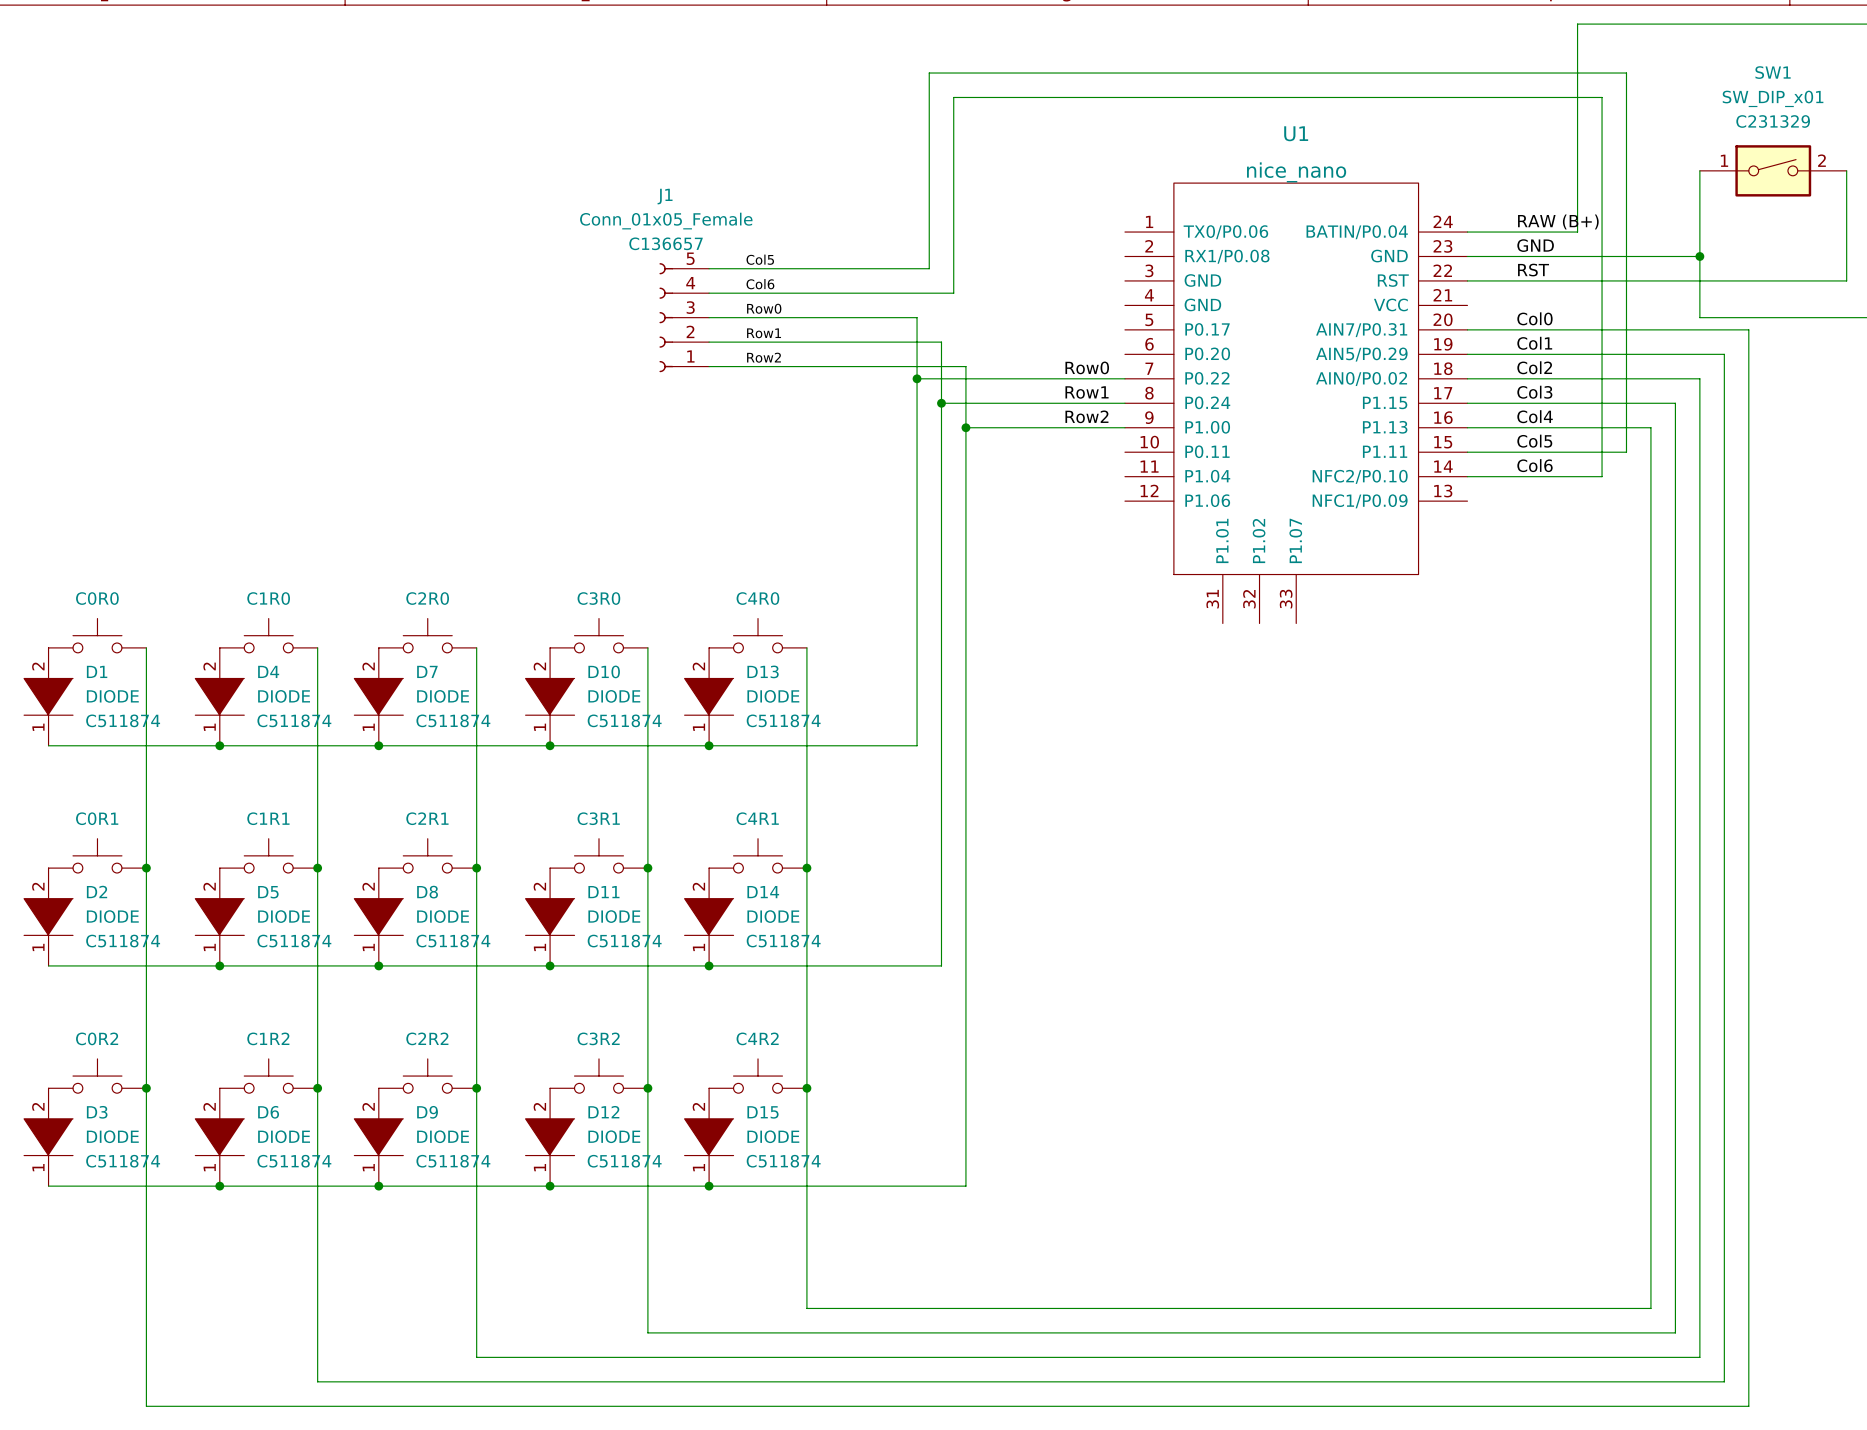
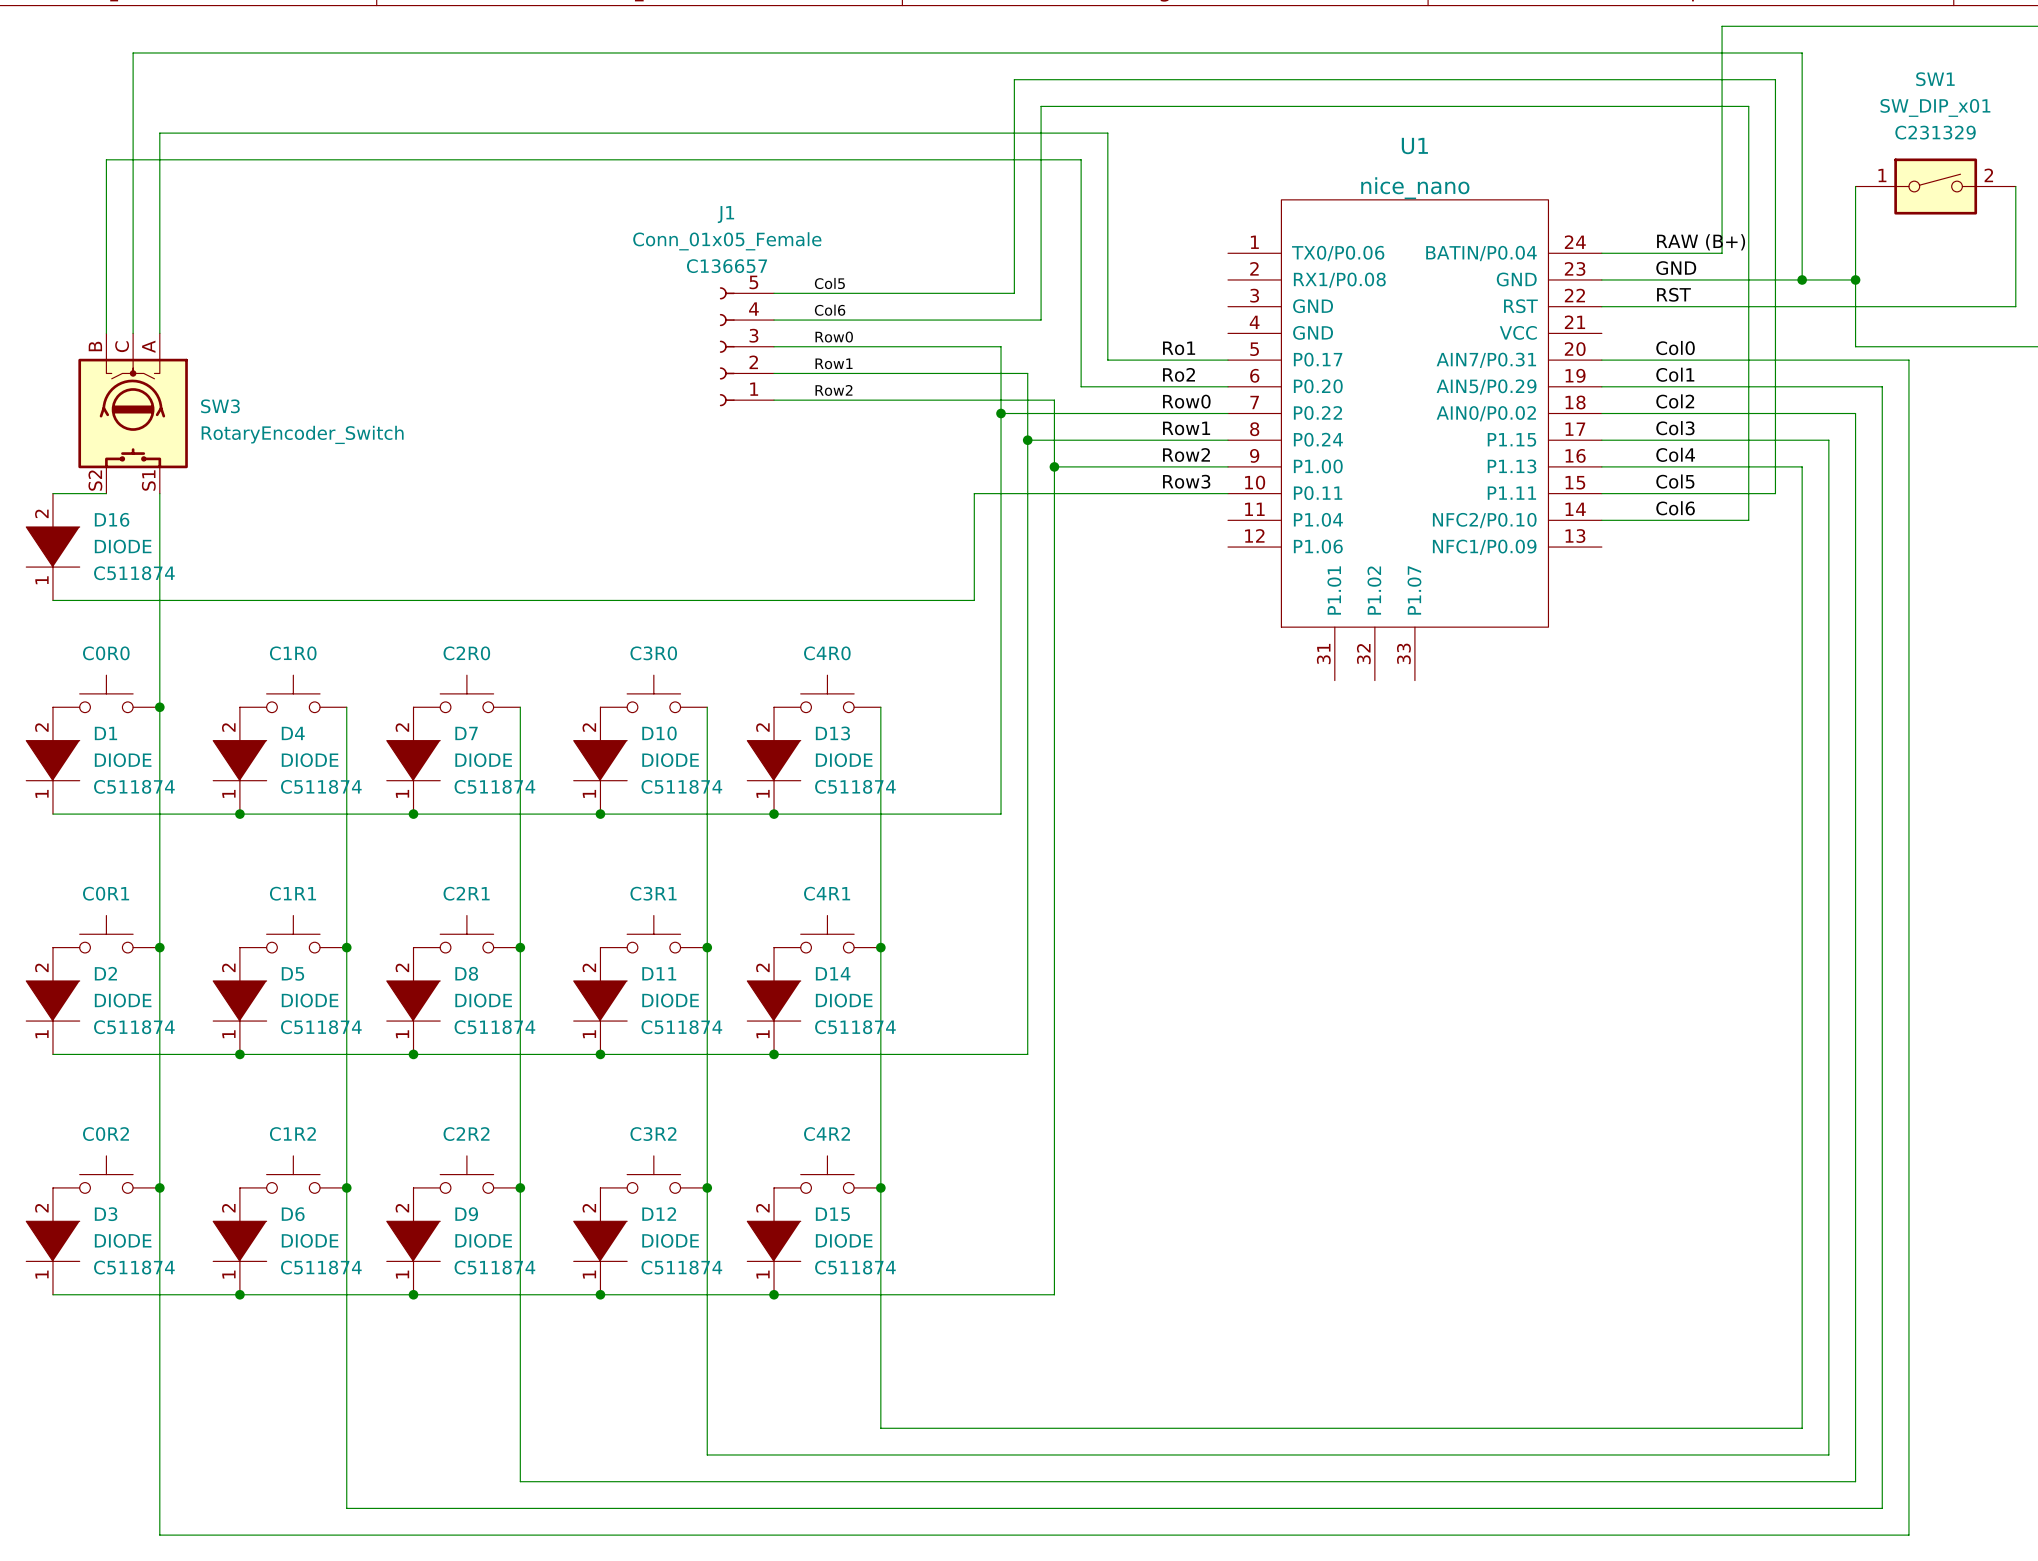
wire: none -> (1802, 279) (1802, 52) (133, 52) (133, 333)
junction: none -> (1802, 279)
wire: none -> (106, 333) (106, 159) (1081, 159) (1081, 386) (1228, 386)
wire: none -> (159, 333) (159, 133) (1107, 133) (1107, 360) (1228, 360)
label: none -> Ro1 (1179, 348)
label: none -> Ro2 (1179, 374)
SW3: none -> RotaryEncoder_Switch (133, 413)
label: none -> Row3 (1186, 481)
wire: none -> (52, 493) (106, 493)
wire: none -> (159, 493) (159, 707)
wire: none -> (1228, 493) (974, 493) (974, 600) (52, 600)
D16: none -> DIODE (52, 547)
junction: none -> (159, 707)

